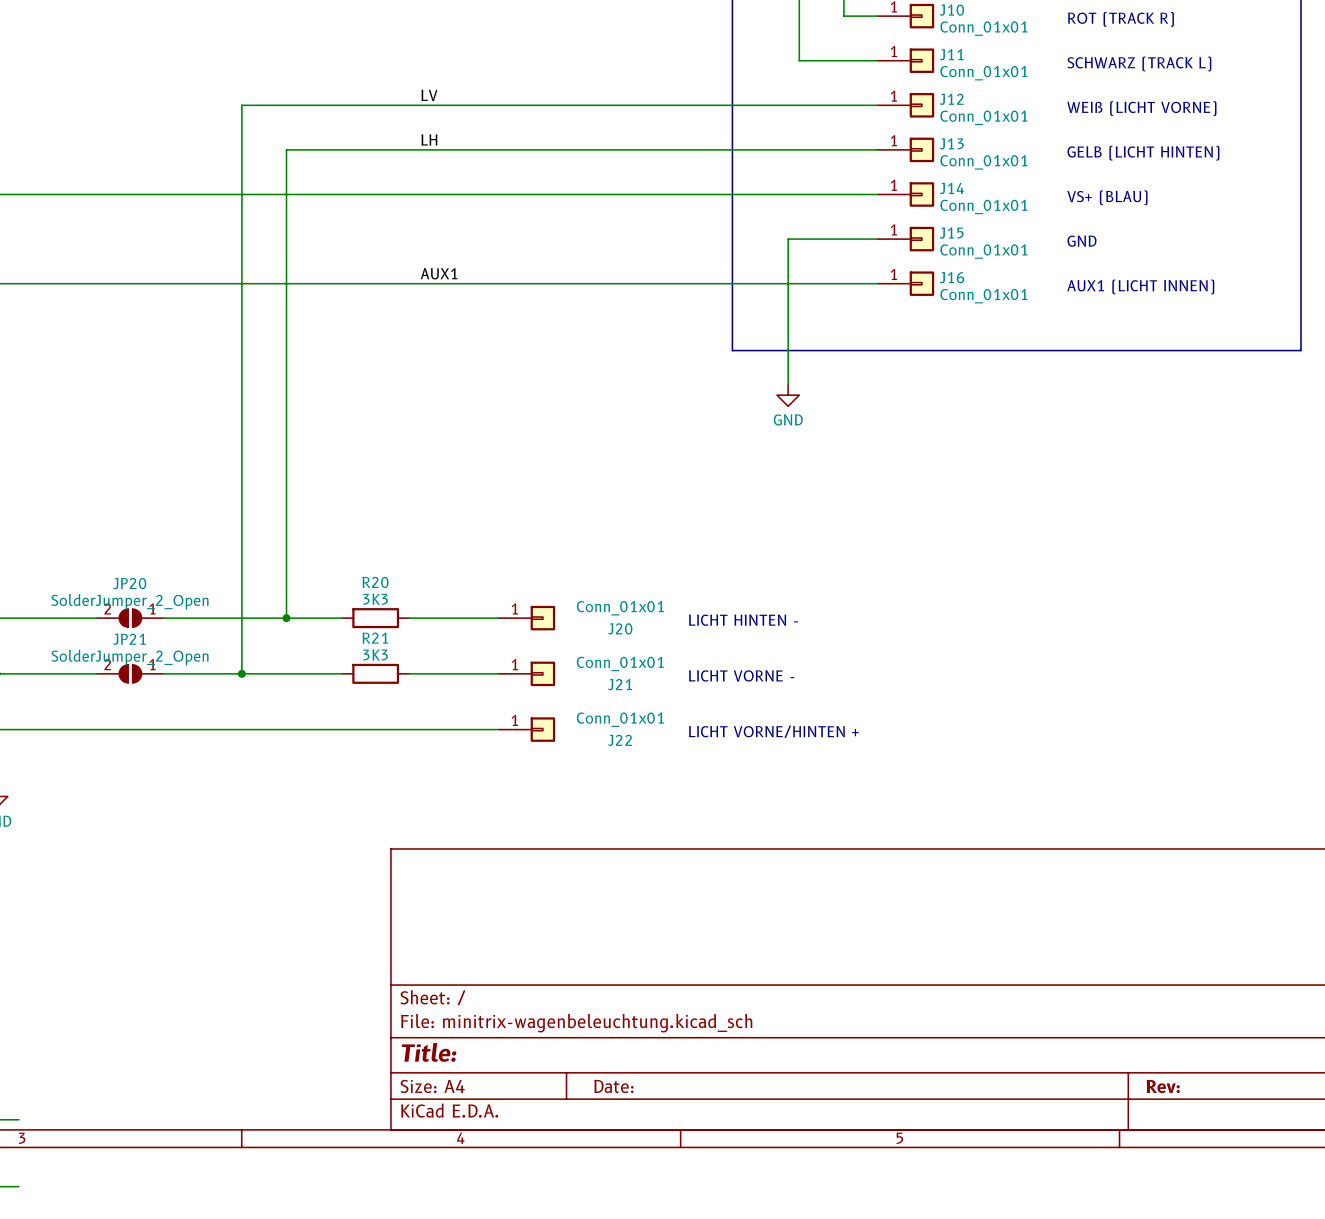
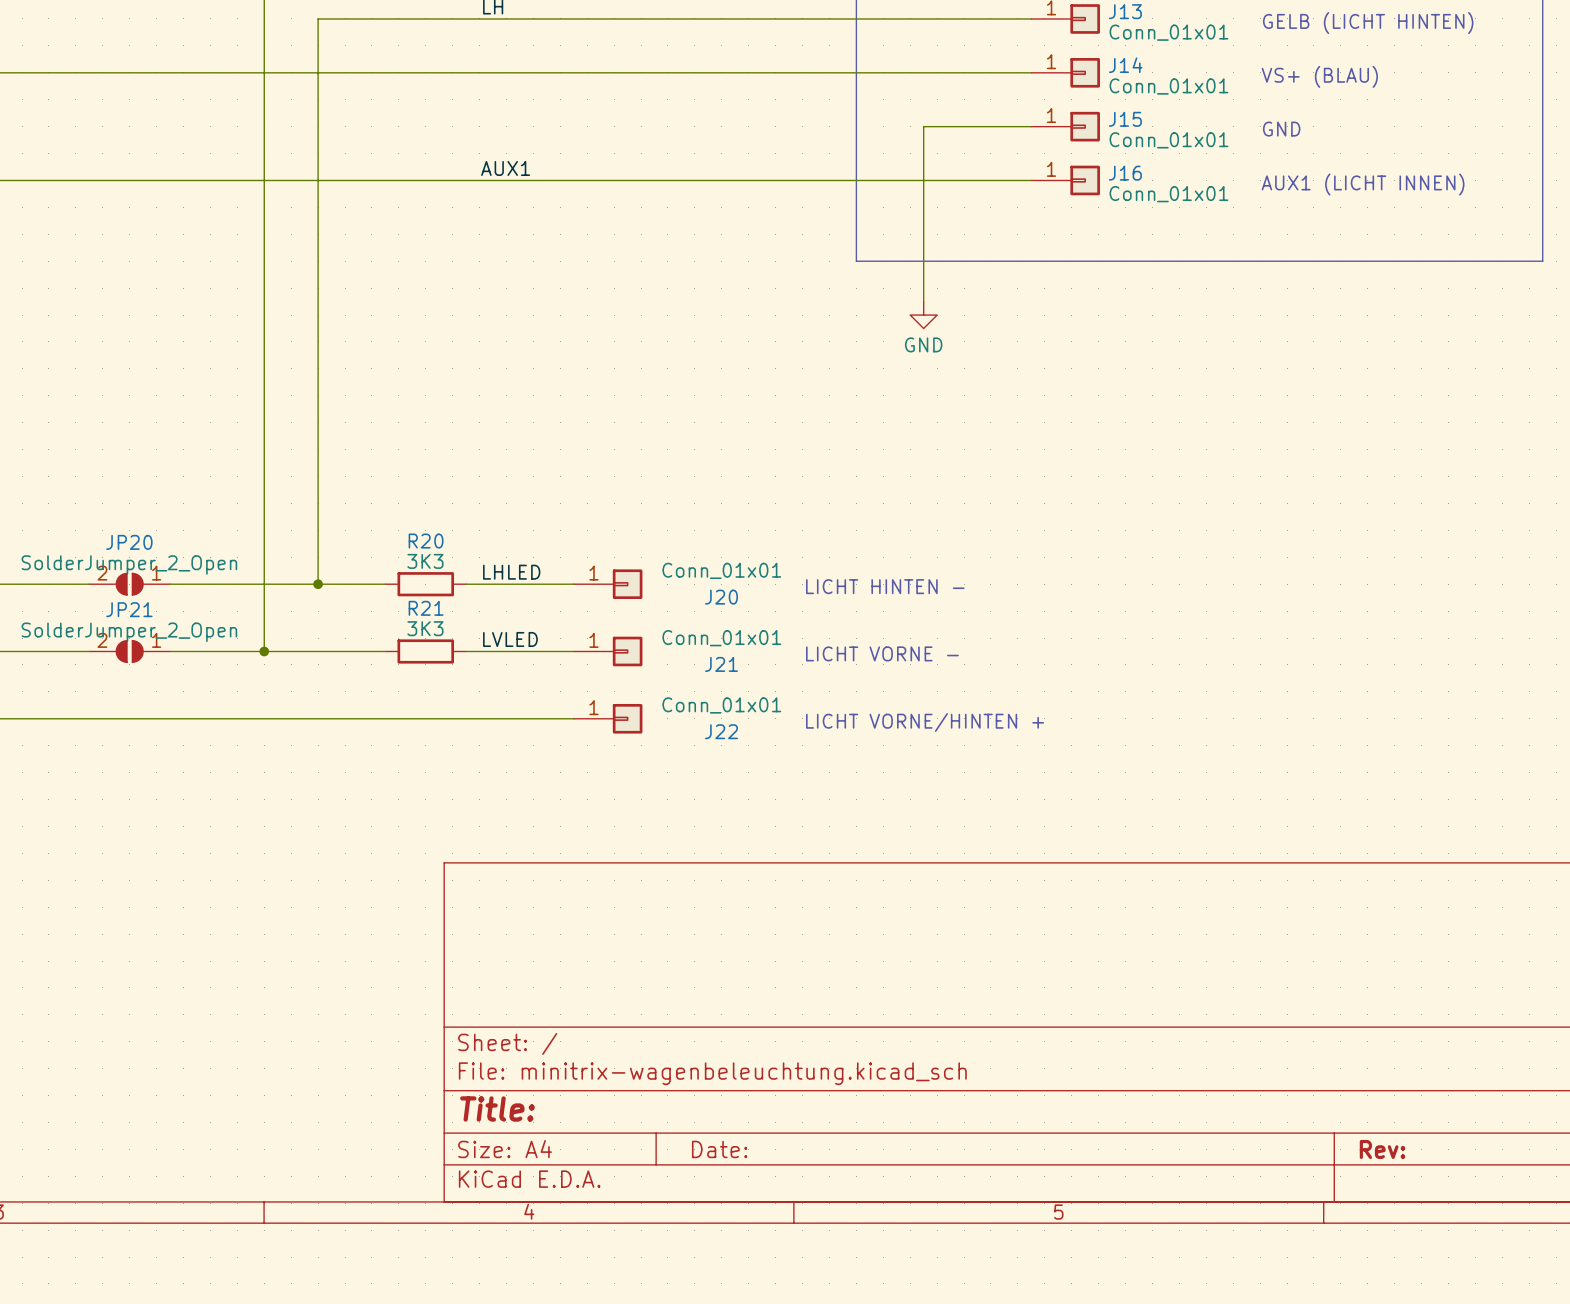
label: none -> LHLED (511, 572)
label: none -> LVLED (510, 639)

